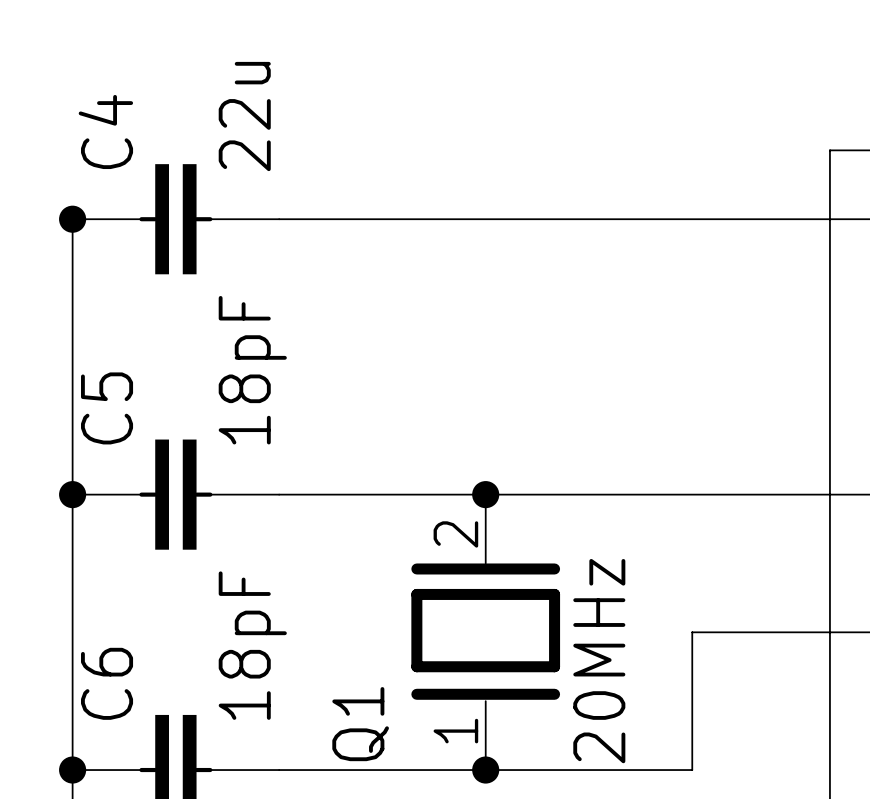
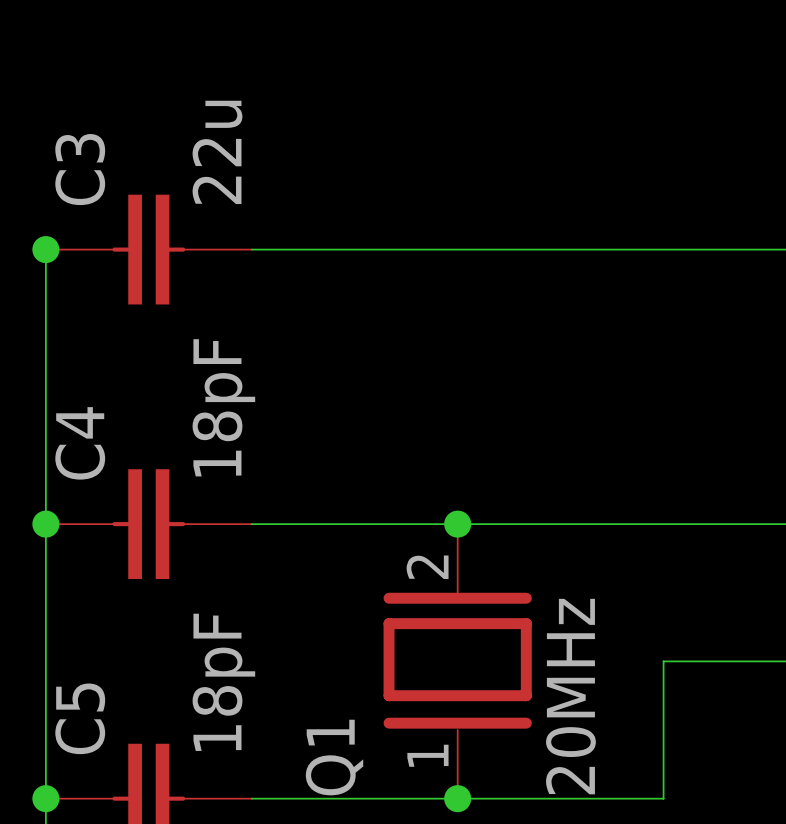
C4 name: C4 (105, 131) -> C3 (80, 169)
C5 name: C5 (107, 408) -> C4 (80, 443)
C6 name: C6 (107, 683) -> C5 (80, 718)

